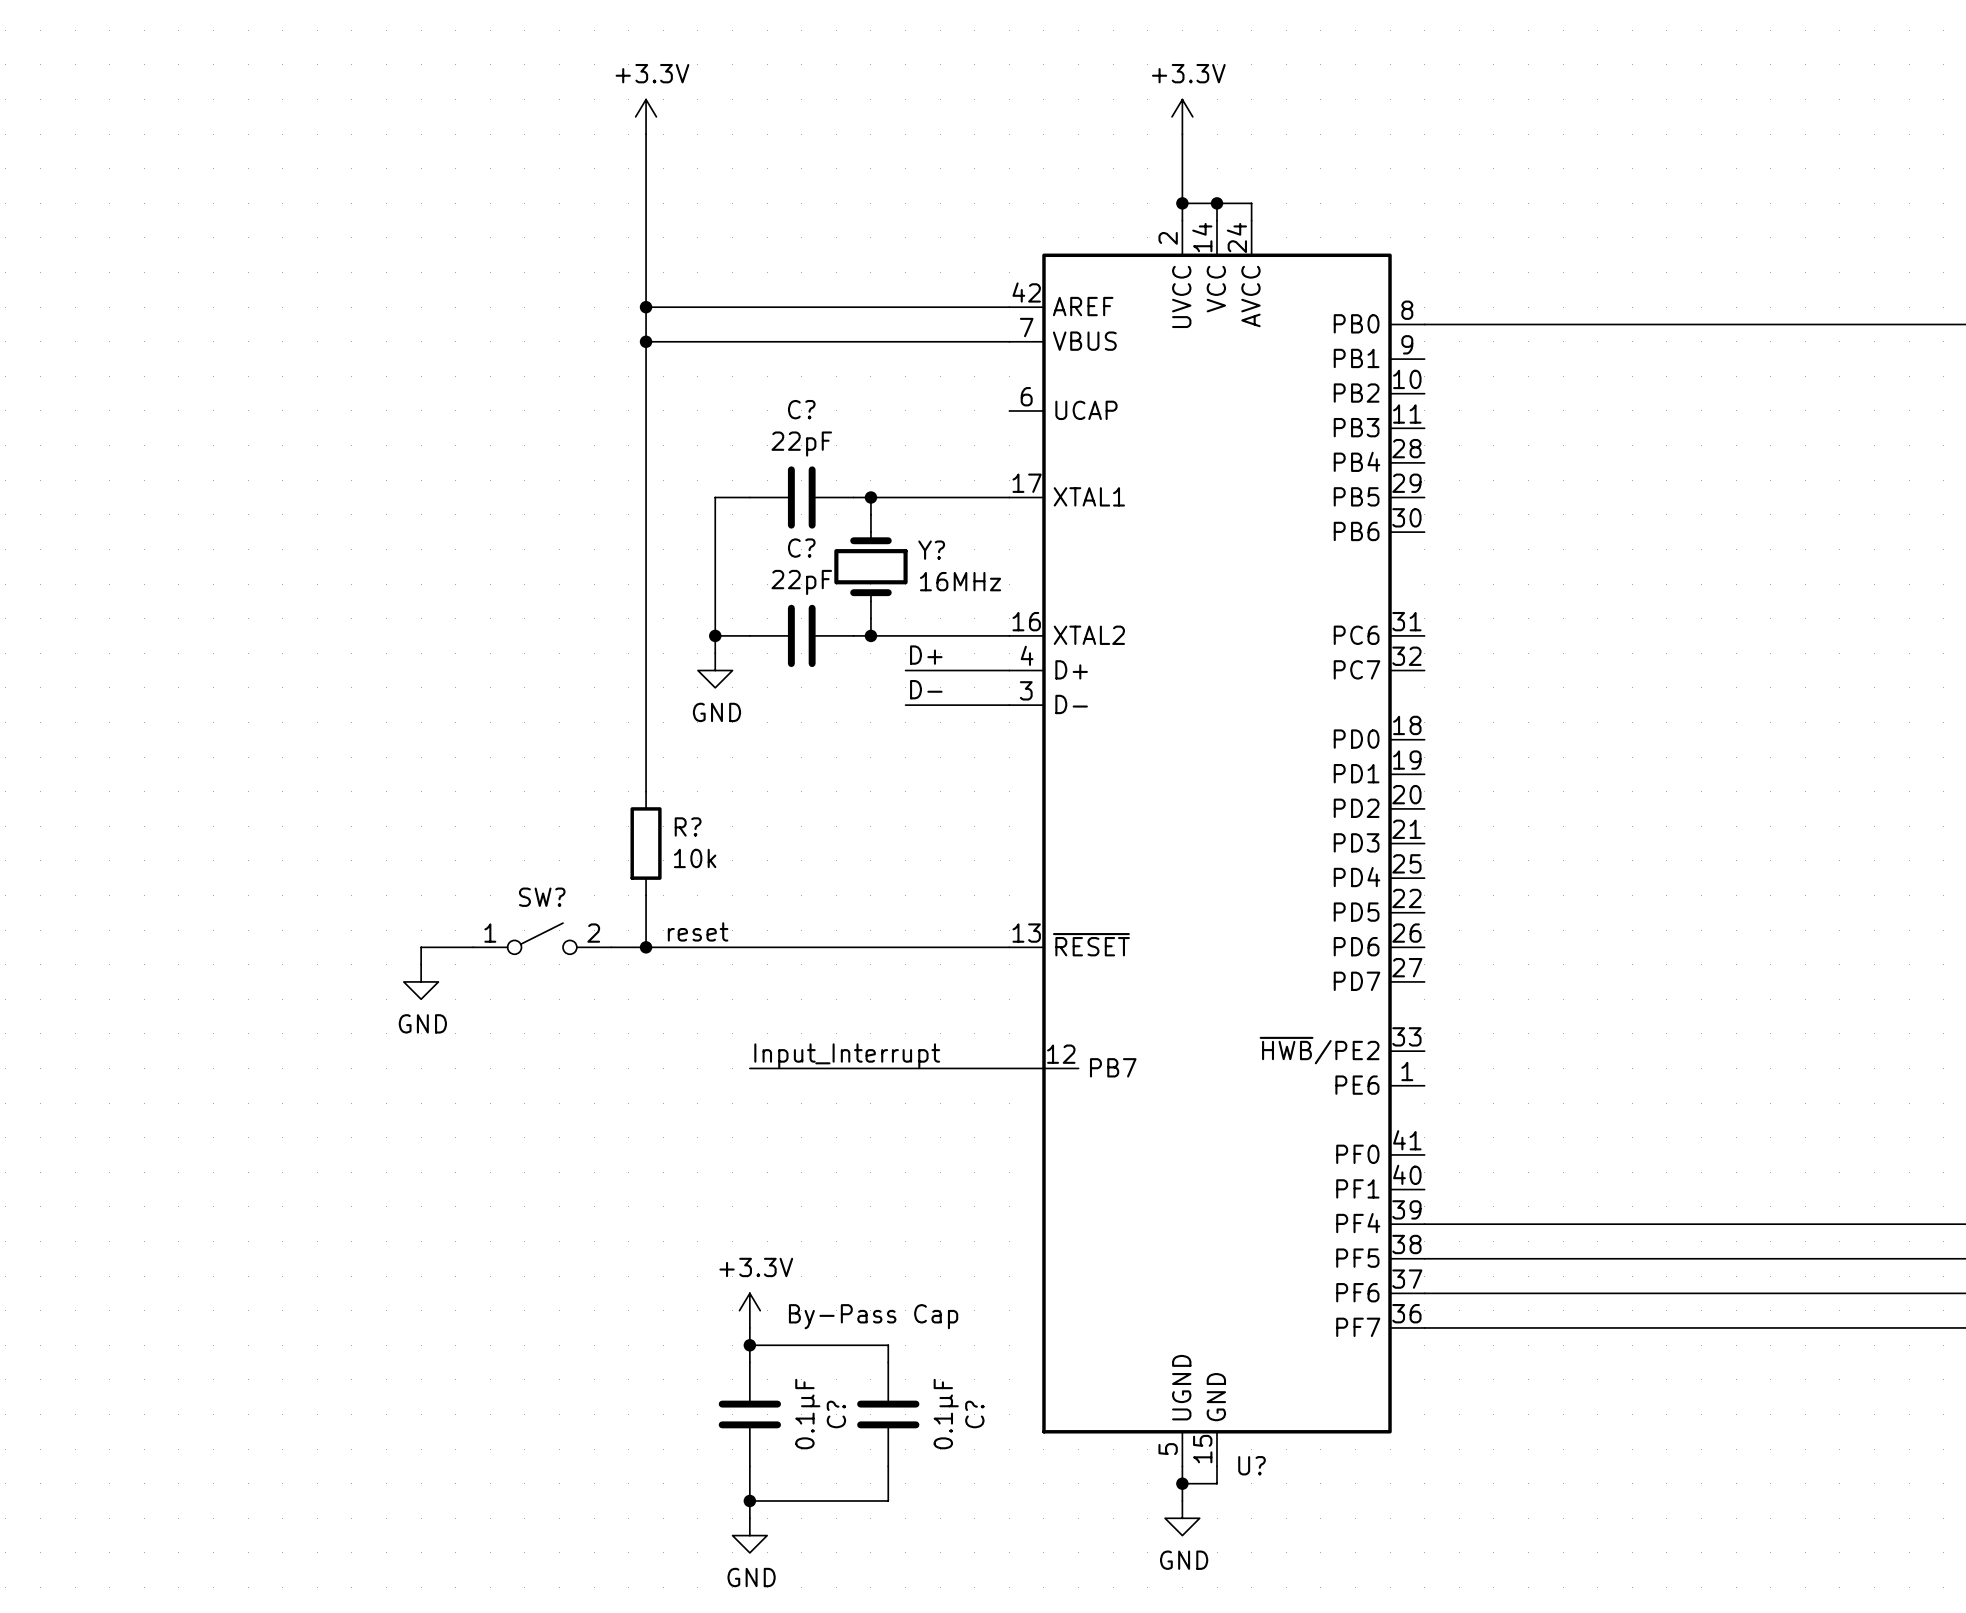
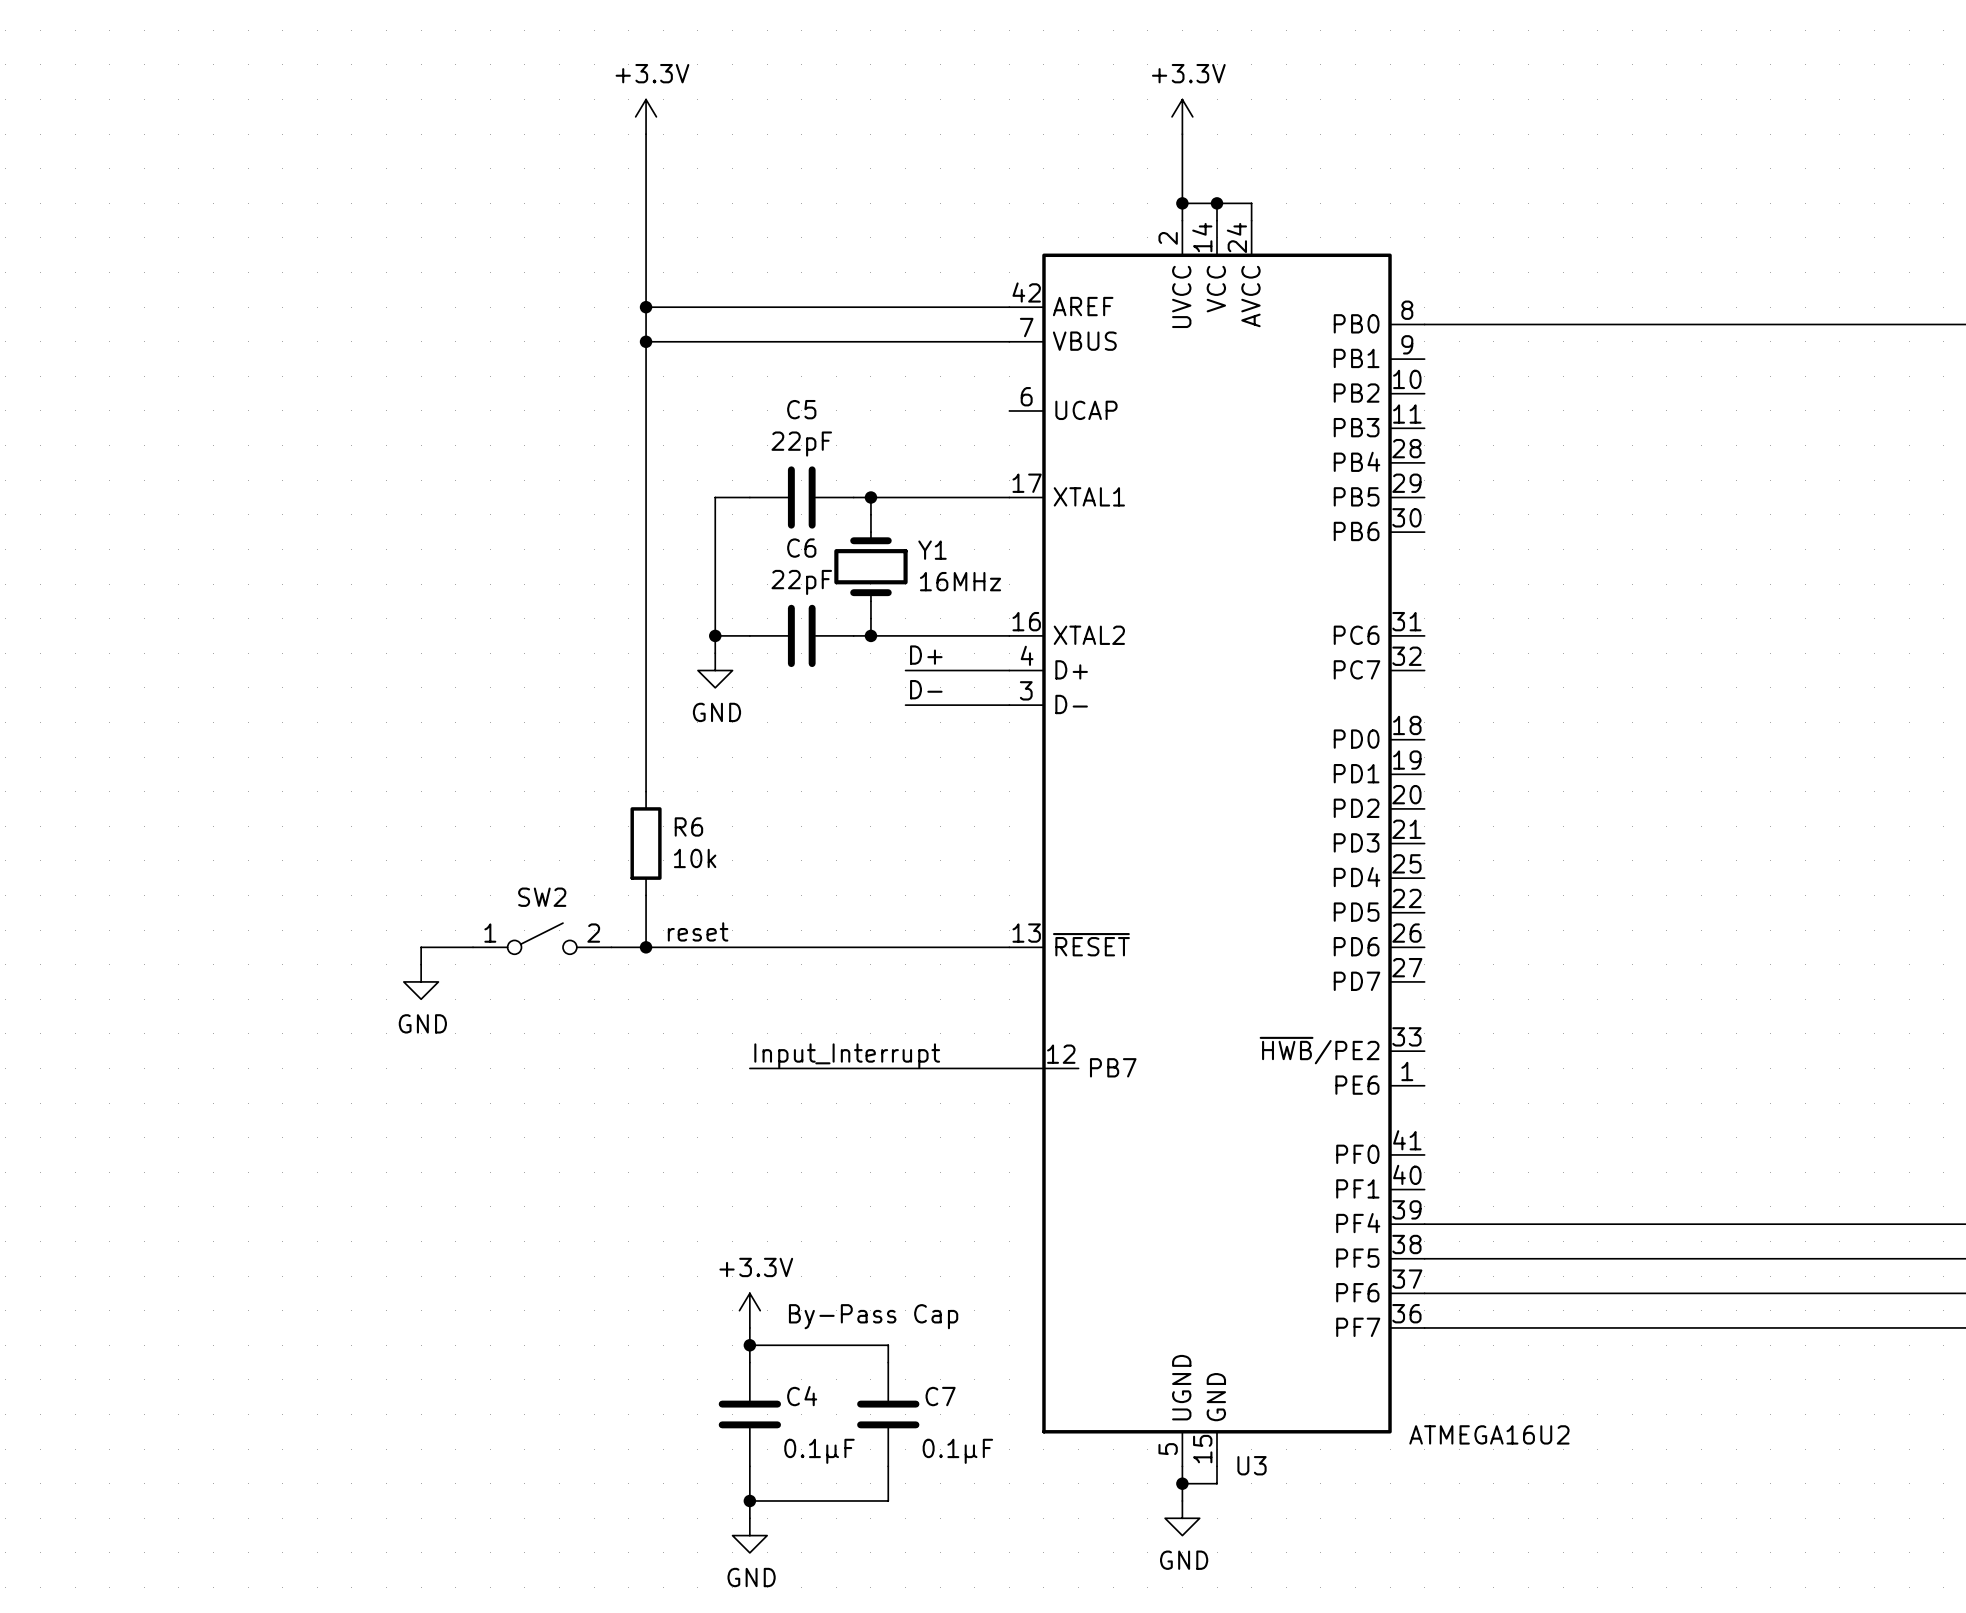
C? name: C? (801, 409) -> C5 (801, 409)
C? name: C? (801, 548) -> C6 (801, 548)
Y? name: Y? (931, 550) -> Y1 (932, 550)
R? name: R? (688, 826) -> R6 (688, 826)
SW? name: SW? (542, 897) -> SW2 (542, 897)
C? value rotation: 0° (807, 1414) -> 90° clockwise (819, 1451)
C? name: C? (836, 1414) -> C4 (802, 1396)
C? value rotation: 0° (946, 1414) -> 90° clockwise (957, 1451)
C? name: C? (974, 1414) -> C7 (940, 1396)
text: none -> ATMEGA16U2 (1489, 1434)
U? name: U? (1252, 1465) -> U3 (1252, 1465)

